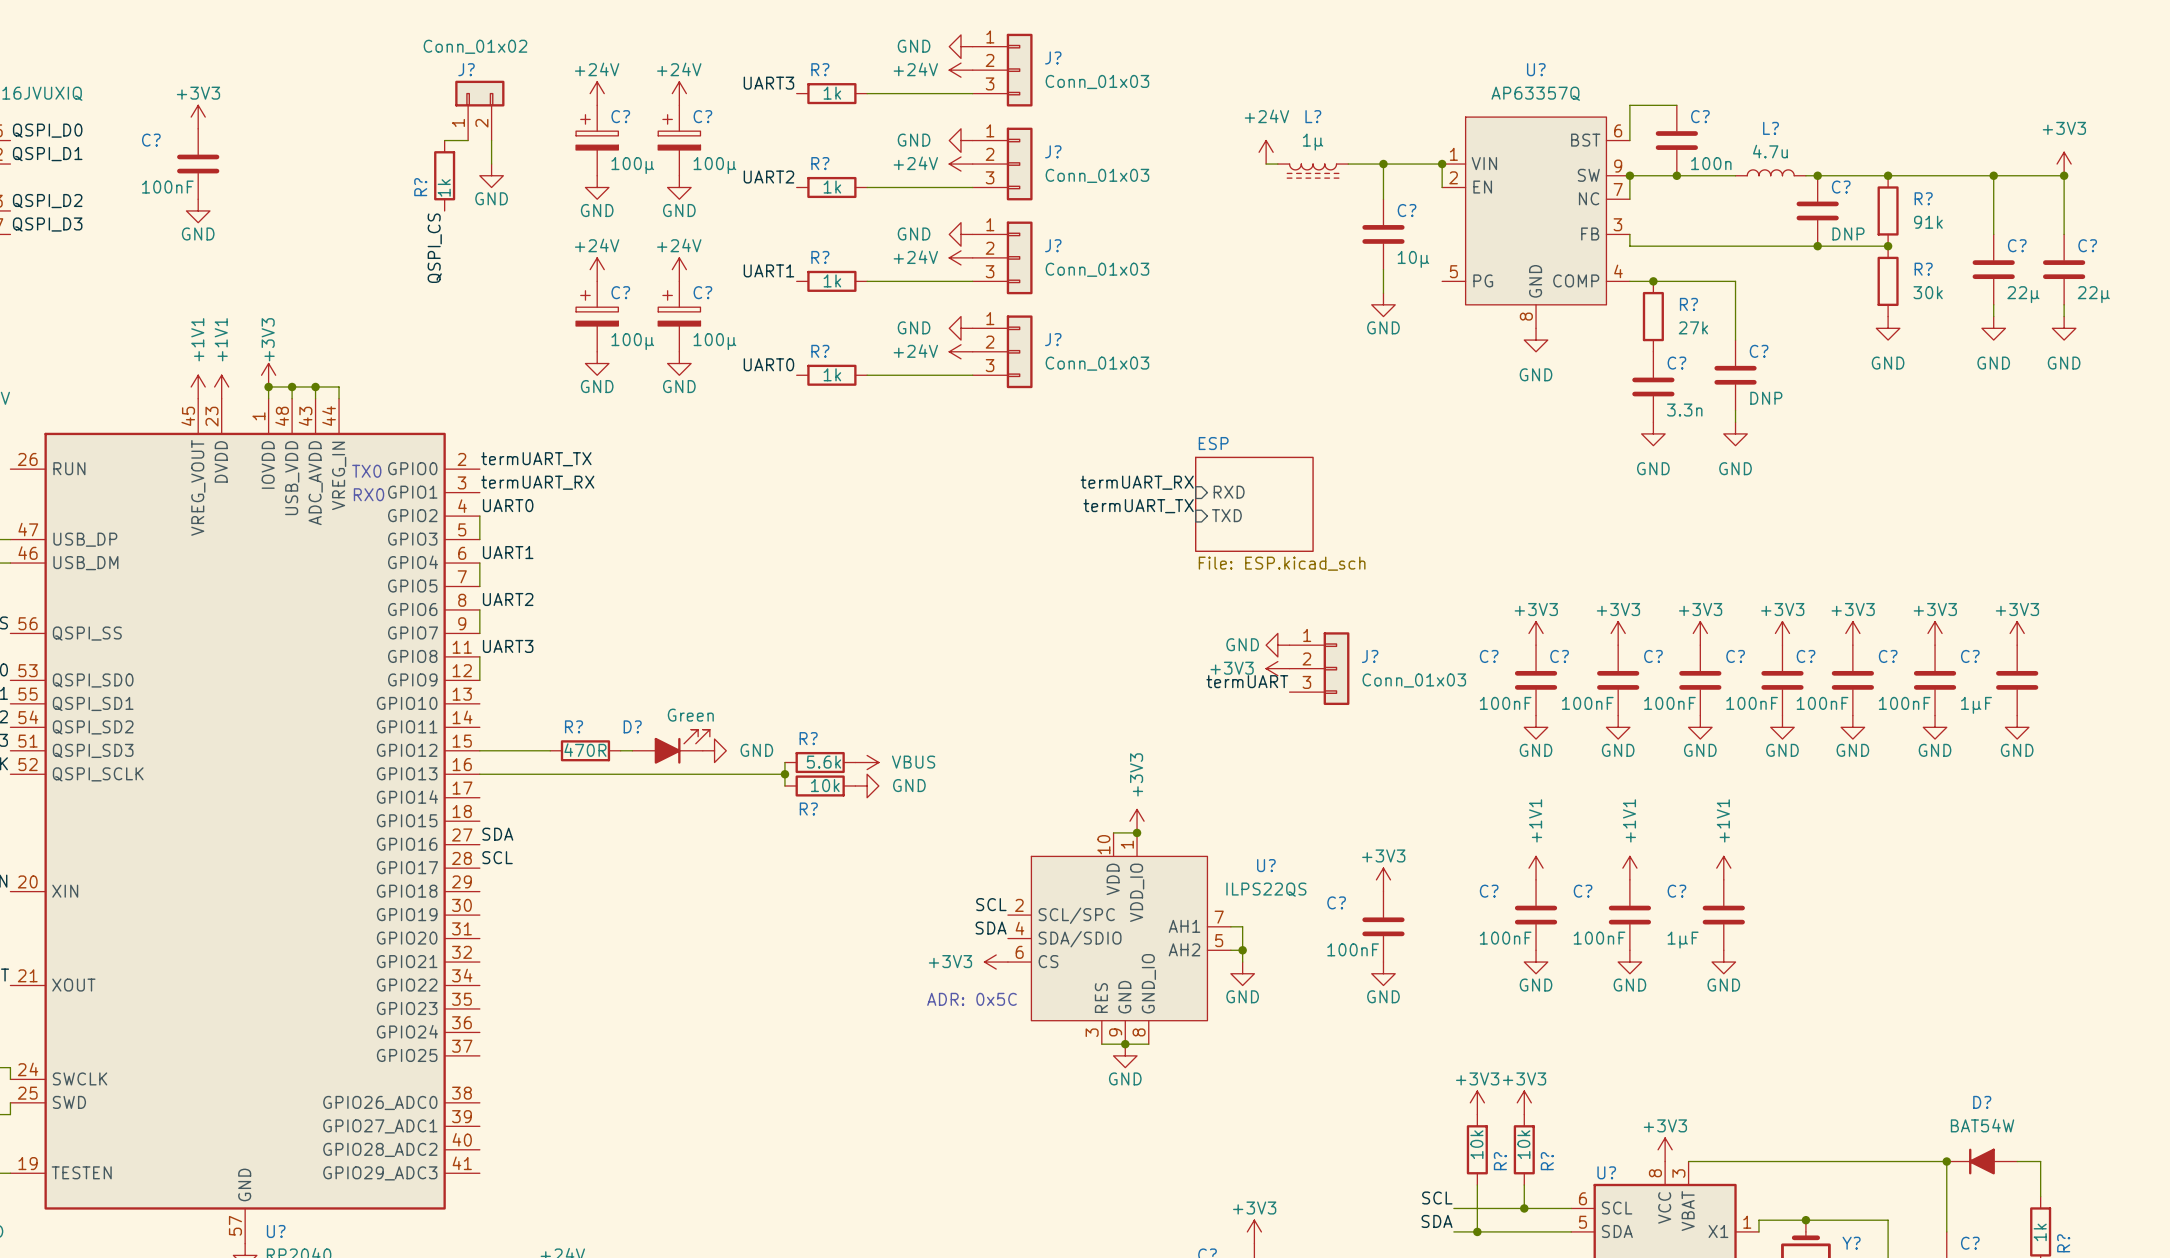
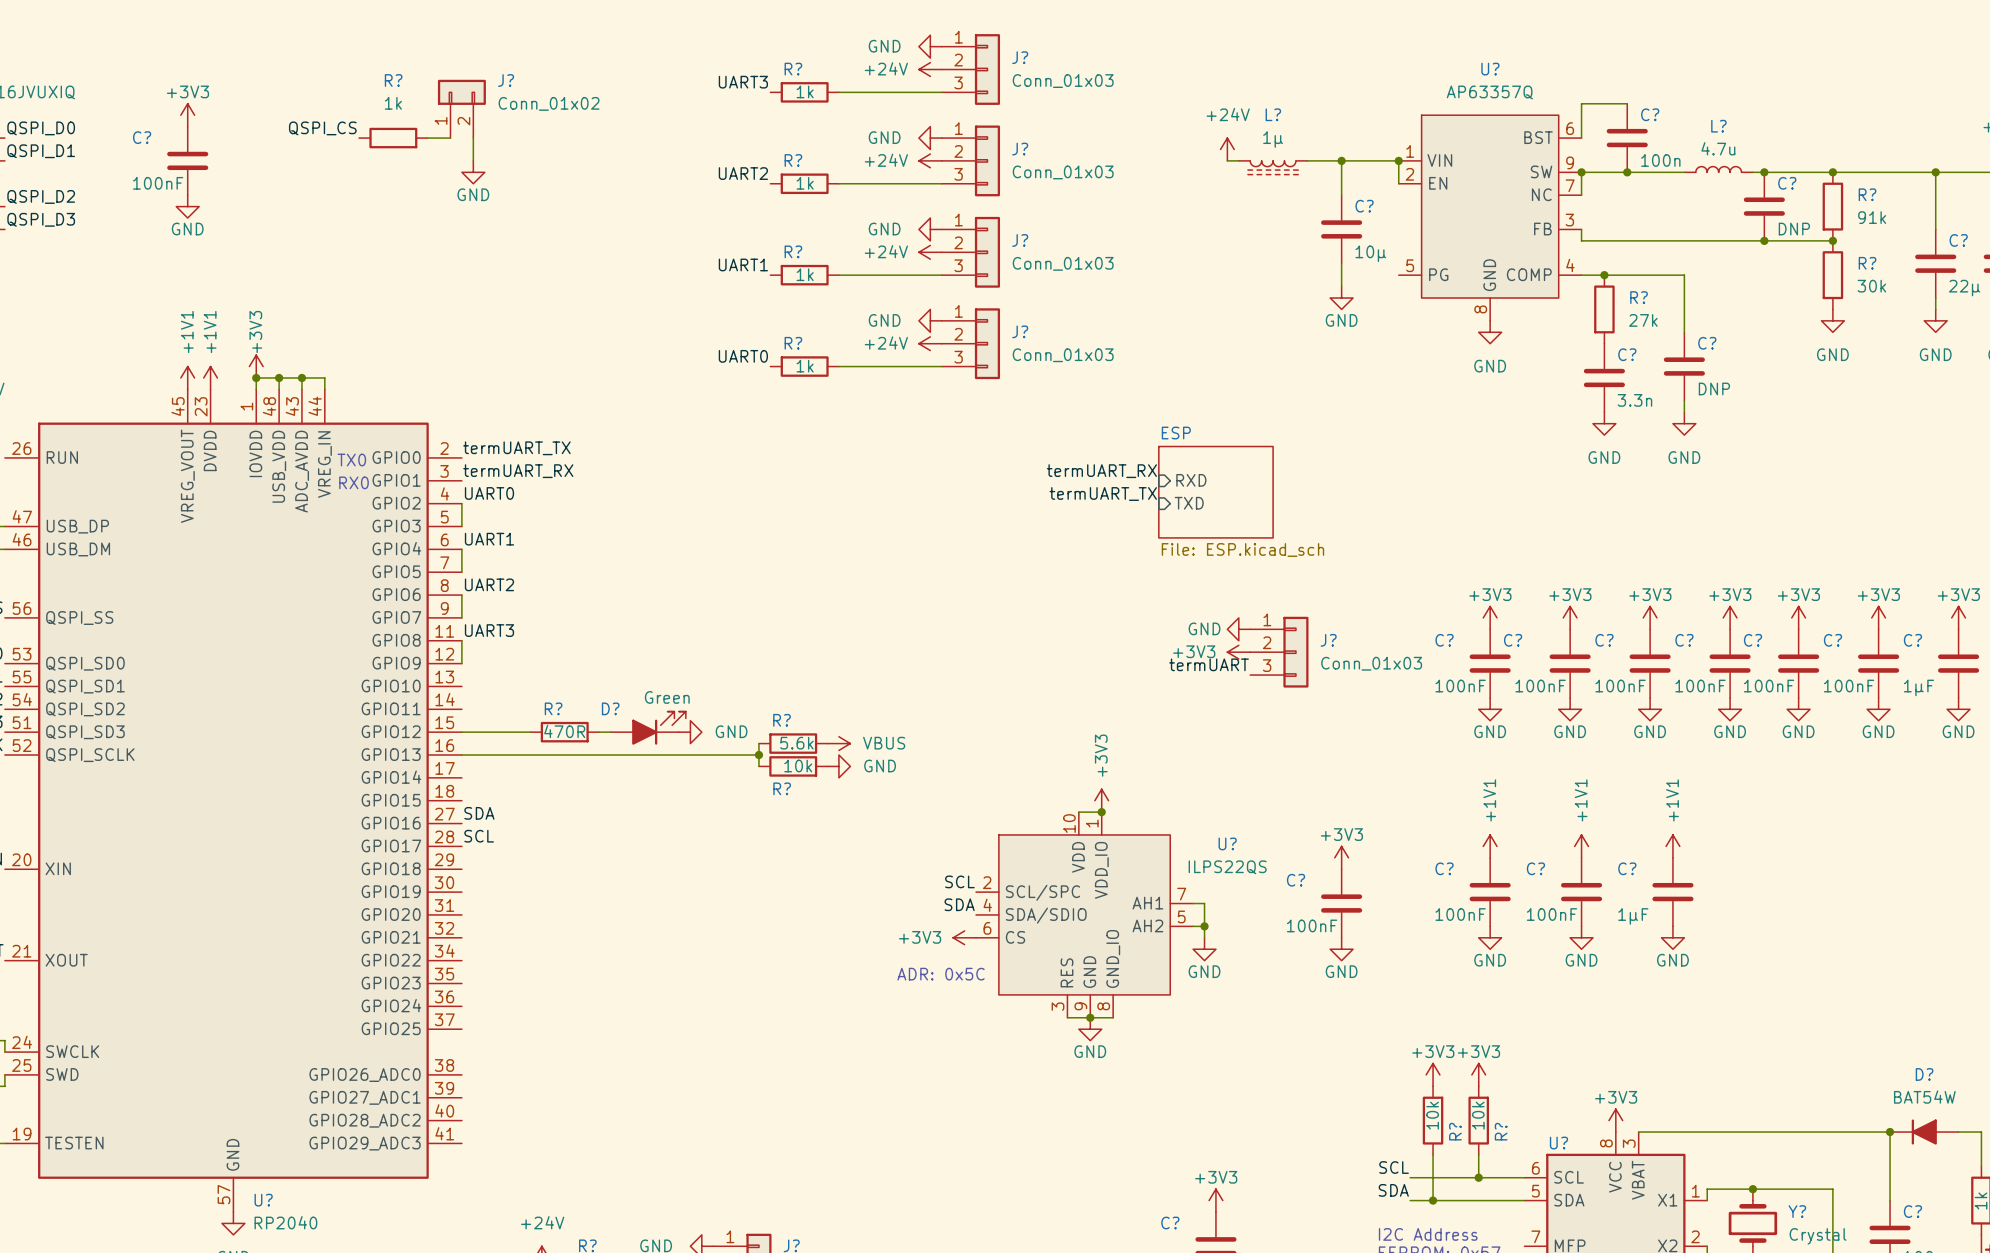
J? value position: Conn_01x02 (475, 46) -> Conn_01x02 (549, 103)
J? name position: J? (466, 69) -> J? (506, 80)
power symbol: +24V (597, 93) -> none
power symbol: +24V (679, 93) -> none
C?: 100µ (597, 140) -> none
C?: 100µ (679, 140) -> none
R? rotation: 0° (444, 175) -> 90° clockwise (393, 138)
R? position: (444, 175) -> (393, 138)
R? name position: R? (420, 187) -> R? (393, 80)
R? value position: 1k (444, 187) -> 1k (393, 103)
power symbol: GND (597, 187) -> none
power symbol: GND (679, 187) -> none
label rotation: 0° (434, 248) -> 90° clockwise (322, 128)
label position: QSPI_CS (434, 248) -> QSPI_CS (322, 128)
power symbol: +24V (597, 269) -> none
power symbol: +24V (679, 269) -> none
C?: 100µ (597, 316) -> none
C?: 100µ (679, 316) -> none
power symbol: GND (597, 363) -> none
power symbol: GND (679, 363) -> none

